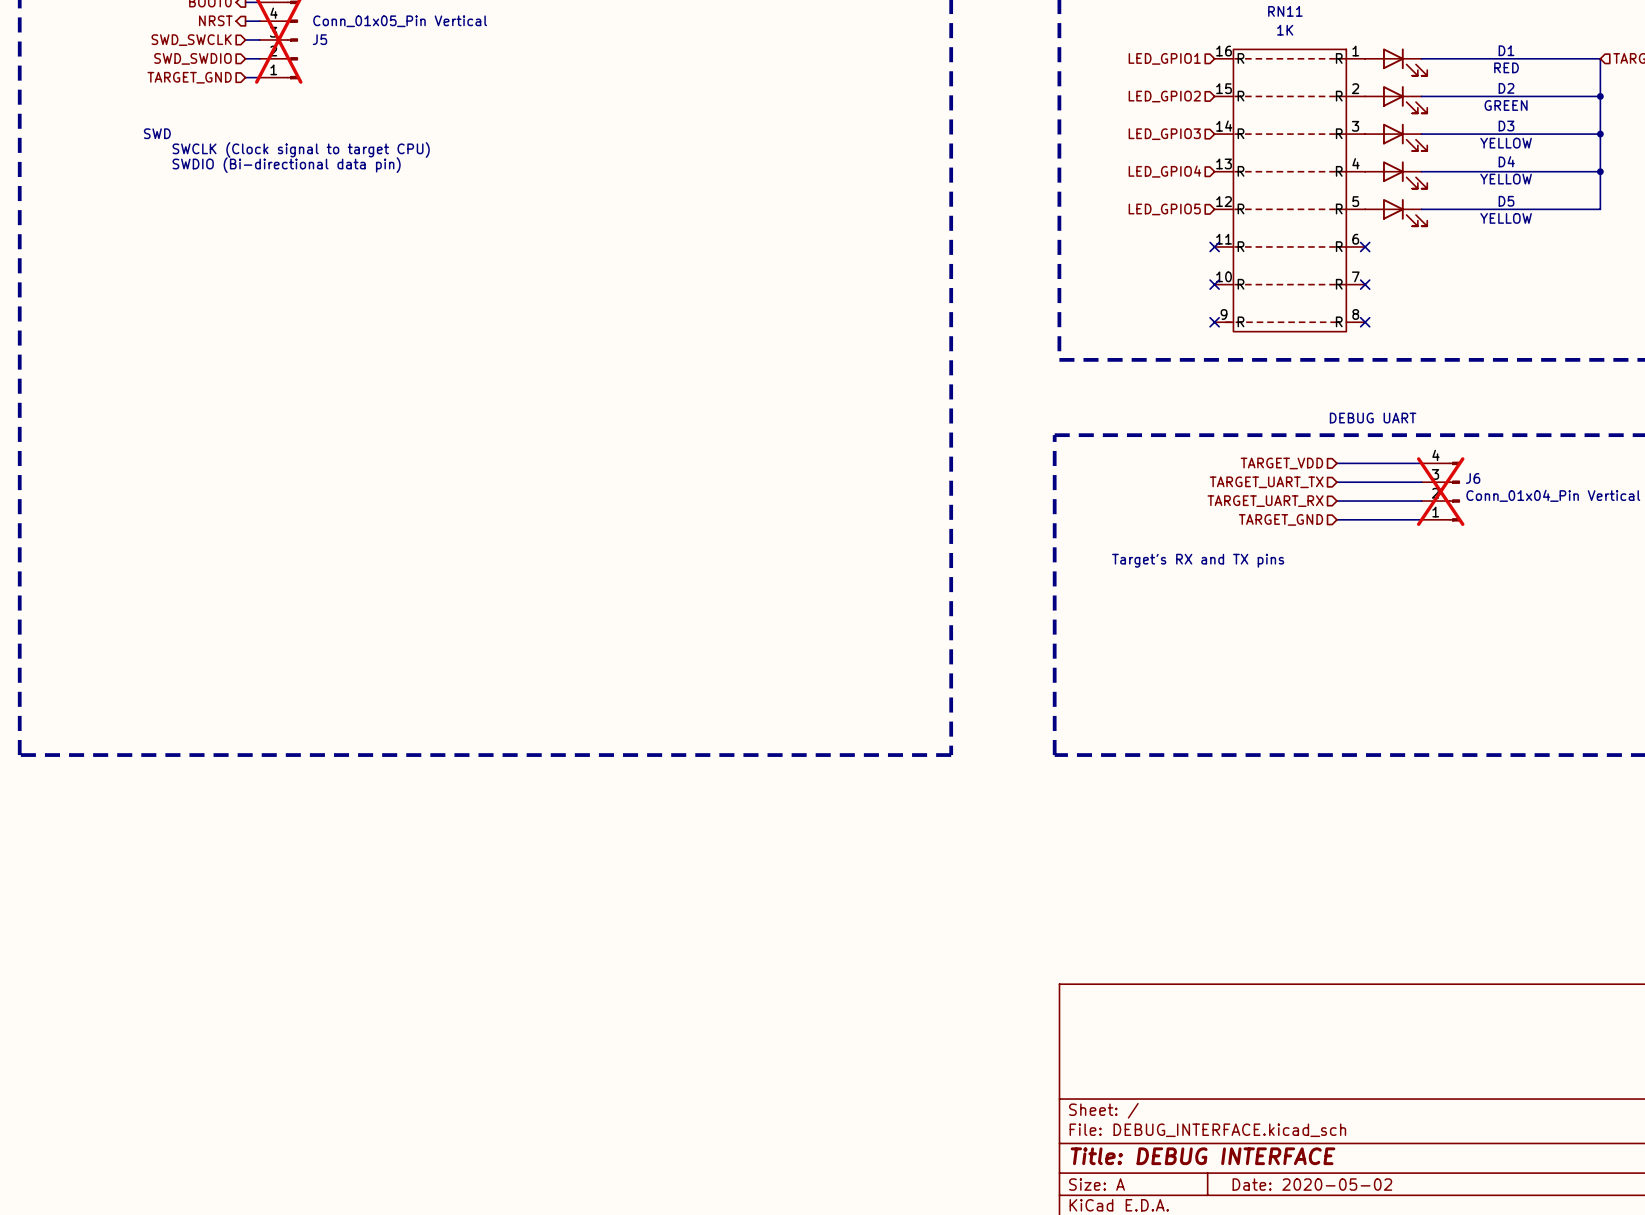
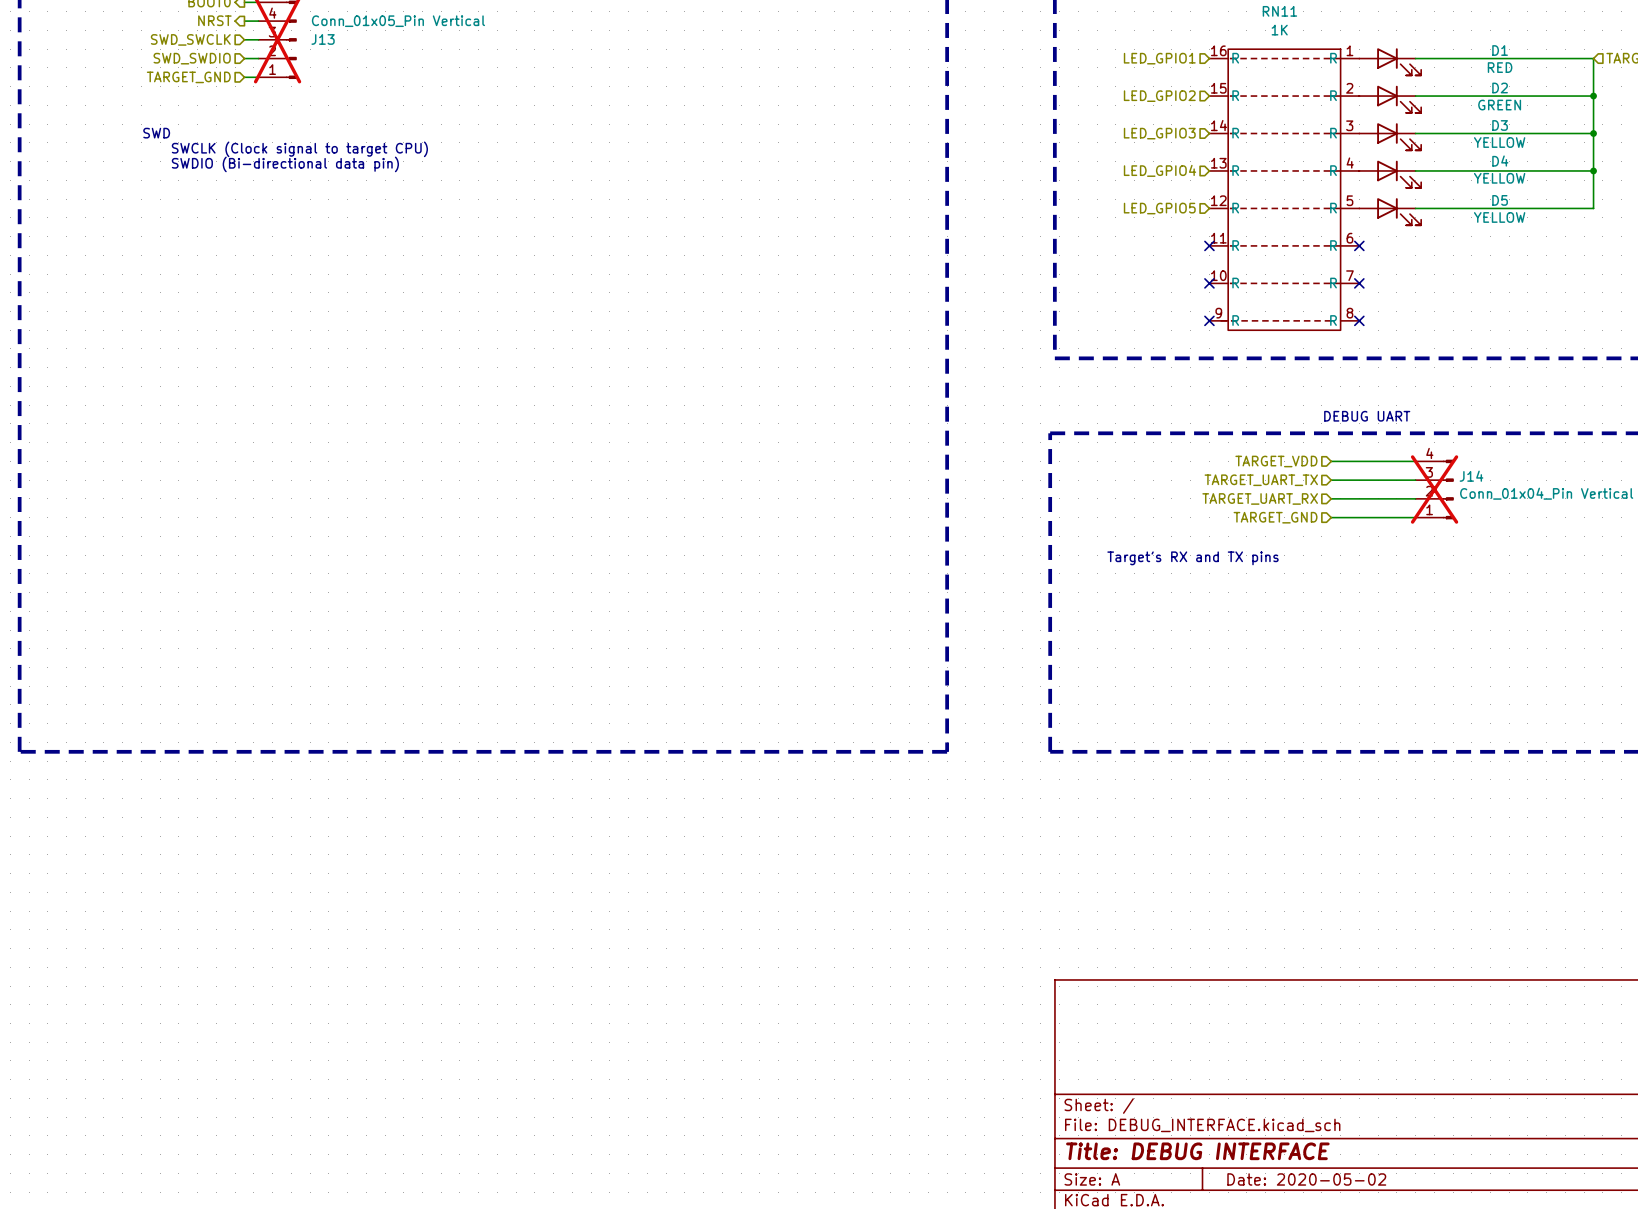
J5 name: J5 (319, 39) -> J13 (323, 39)
J6 name: J6 (1473, 478) -> J14 (1471, 476)

